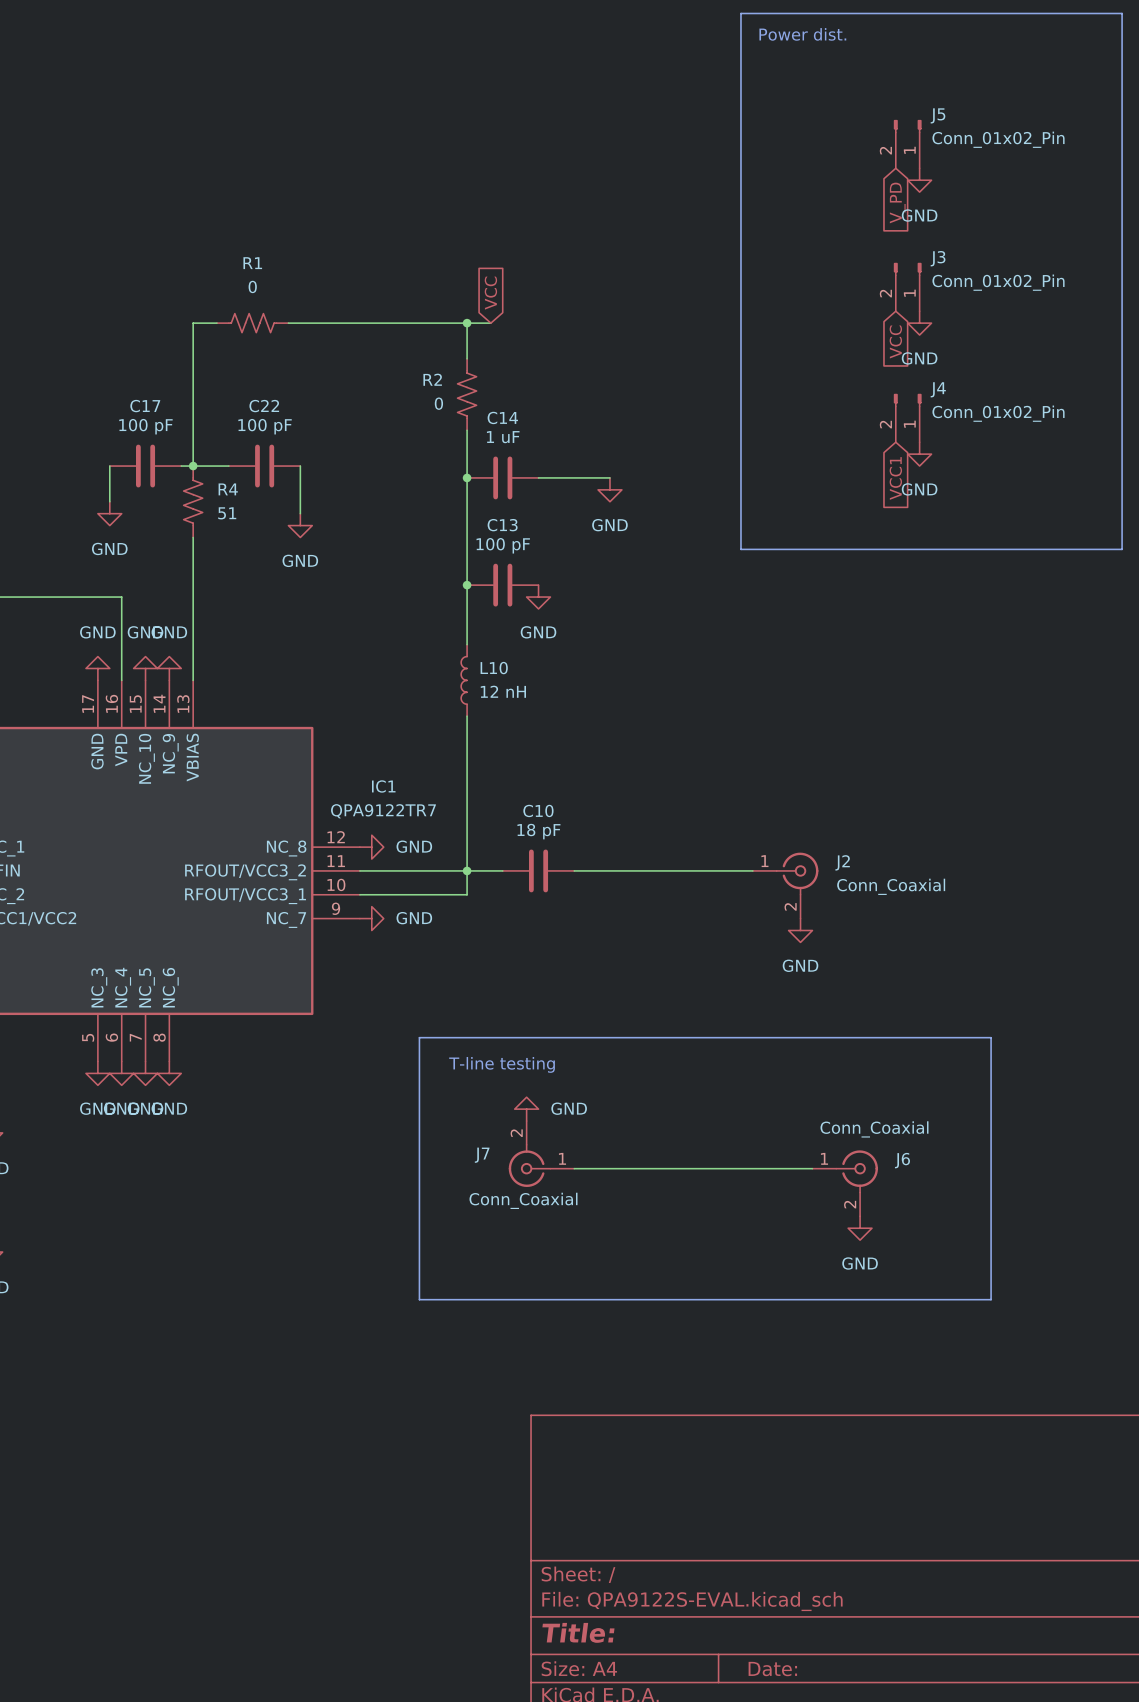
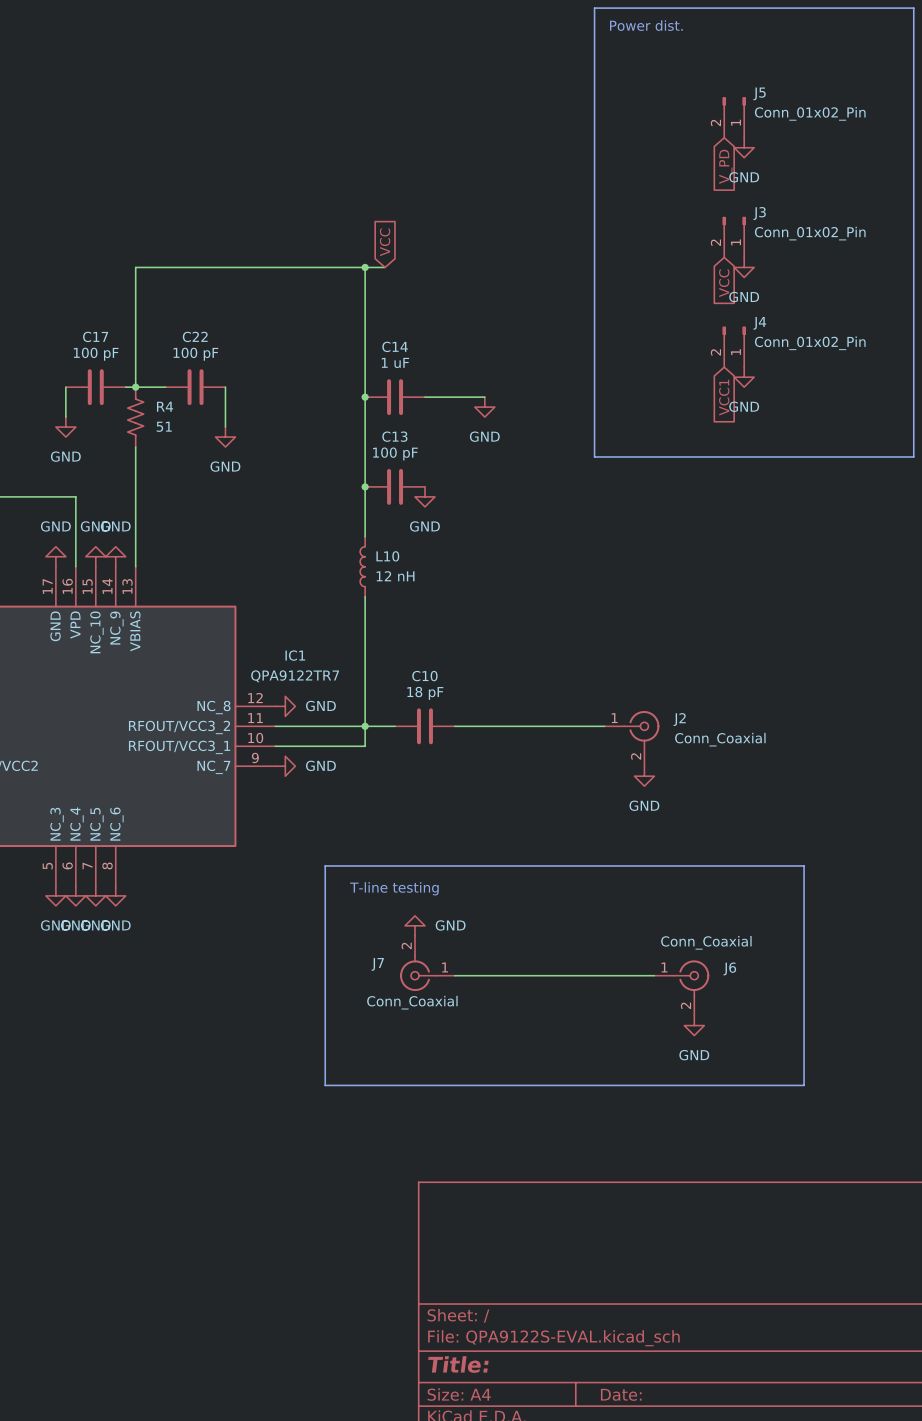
R1: 0 (252, 323) -> none
R2: 0 (467, 394) -> none

